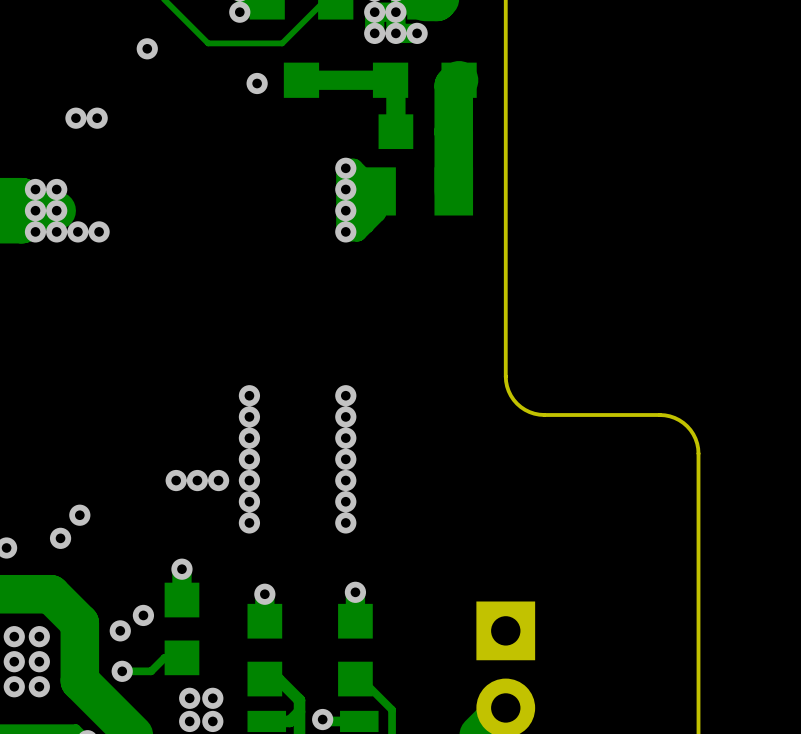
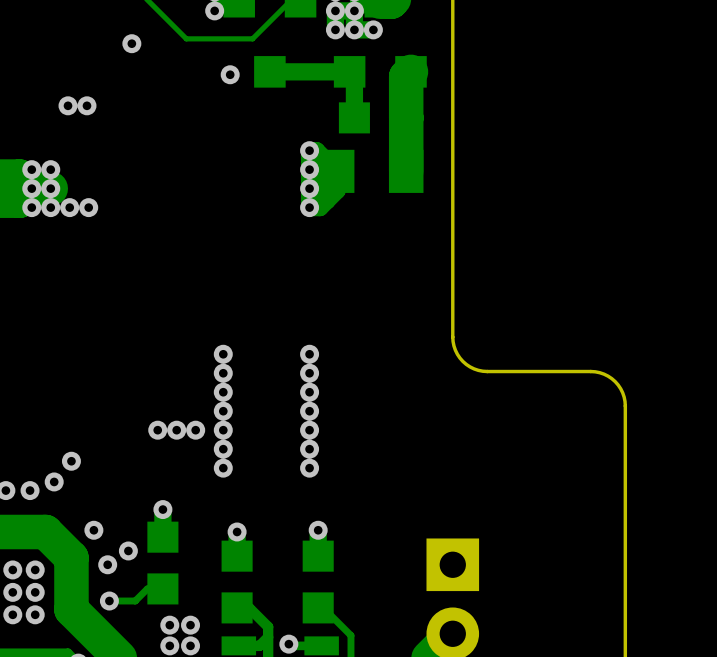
via: none -> (30, 490)
via: none -> (93, 530)

